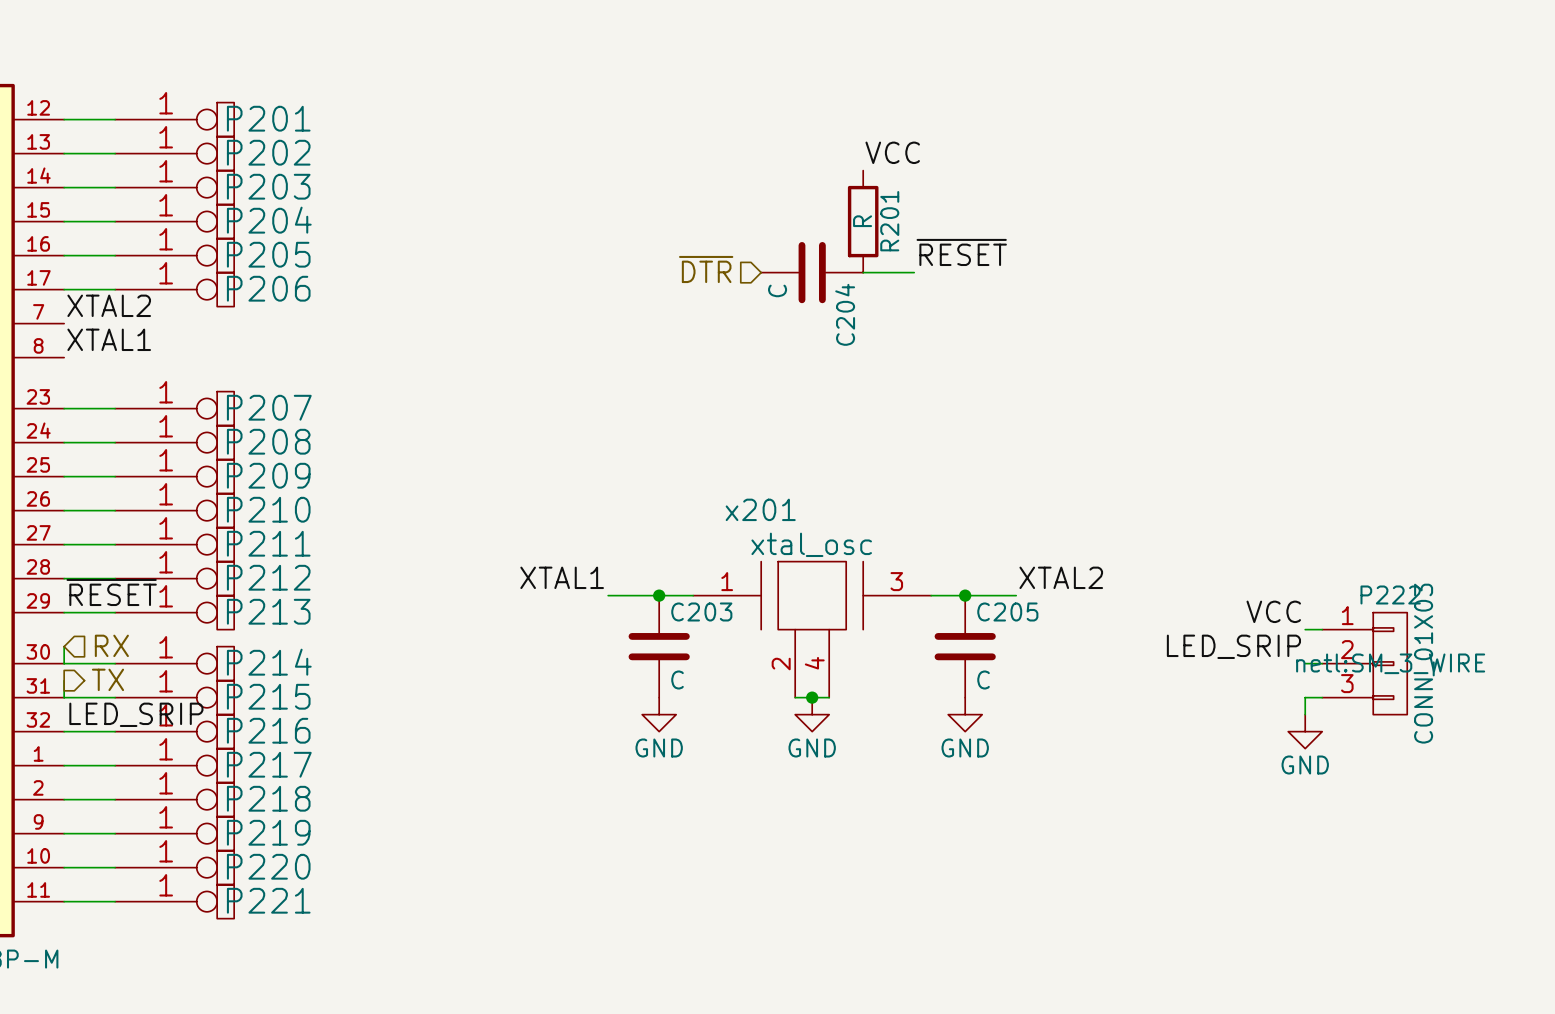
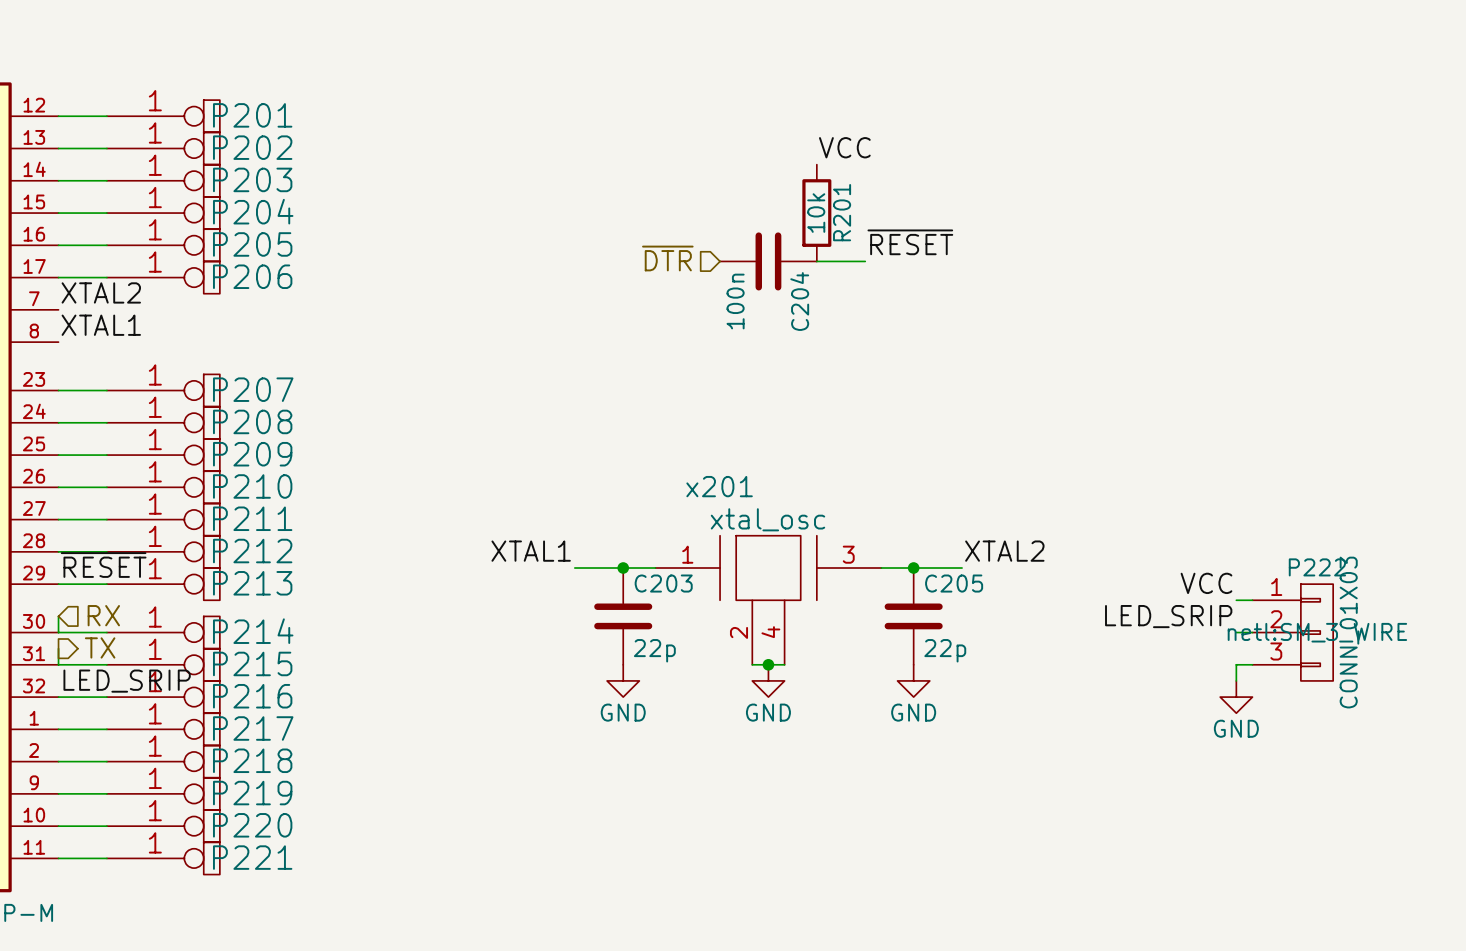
R201 value: R (862, 221) -> 10k (816, 213)
C204 value: C (777, 290) -> 100n (735, 301)
C203 value: C (677, 679) -> 22p (654, 650)
C205 value: C (983, 679) -> 22p (945, 650)

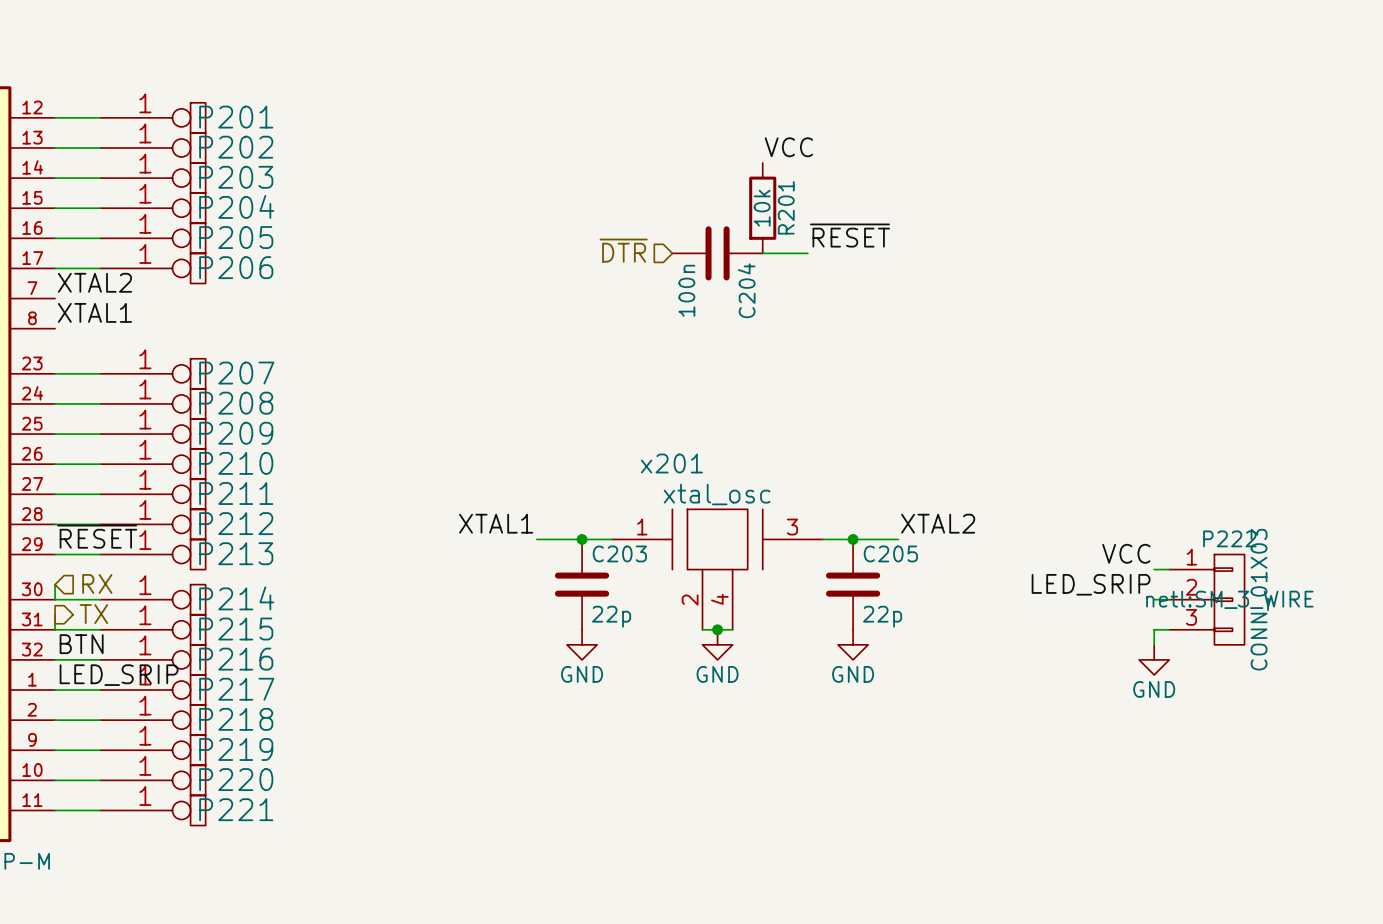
label: LED_SRIP (127, 681) -> BTN (81, 644)
label: none -> LED_SRIP (119, 675)

